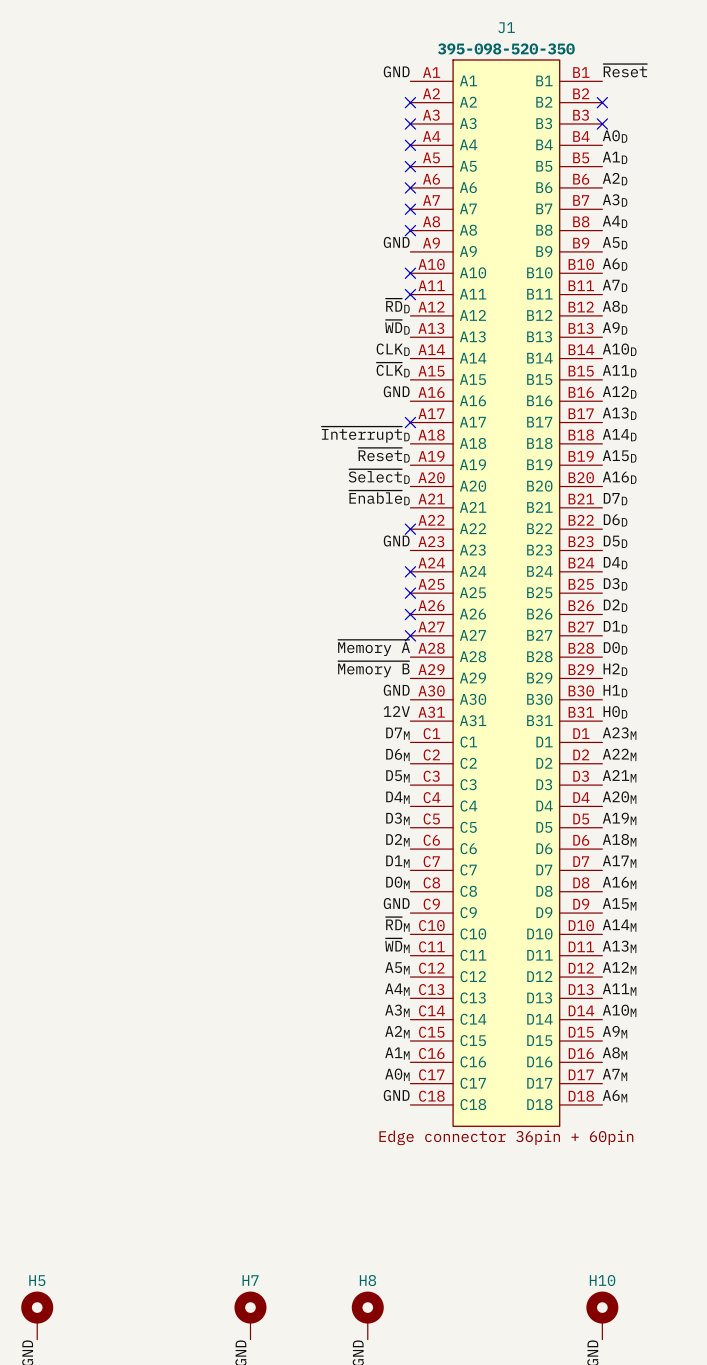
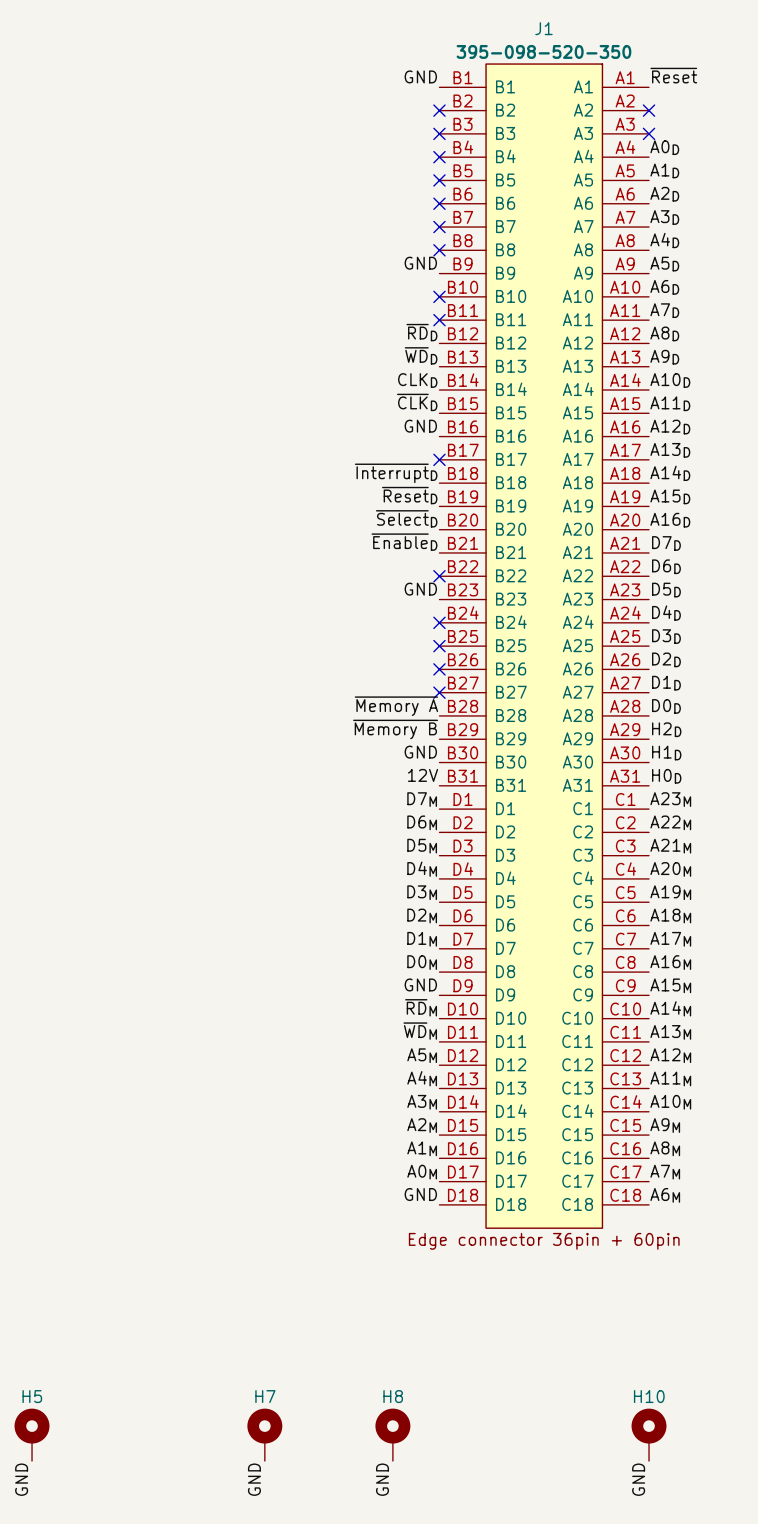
J1 flip: as is (506, 593) -> left-right (544, 646)

